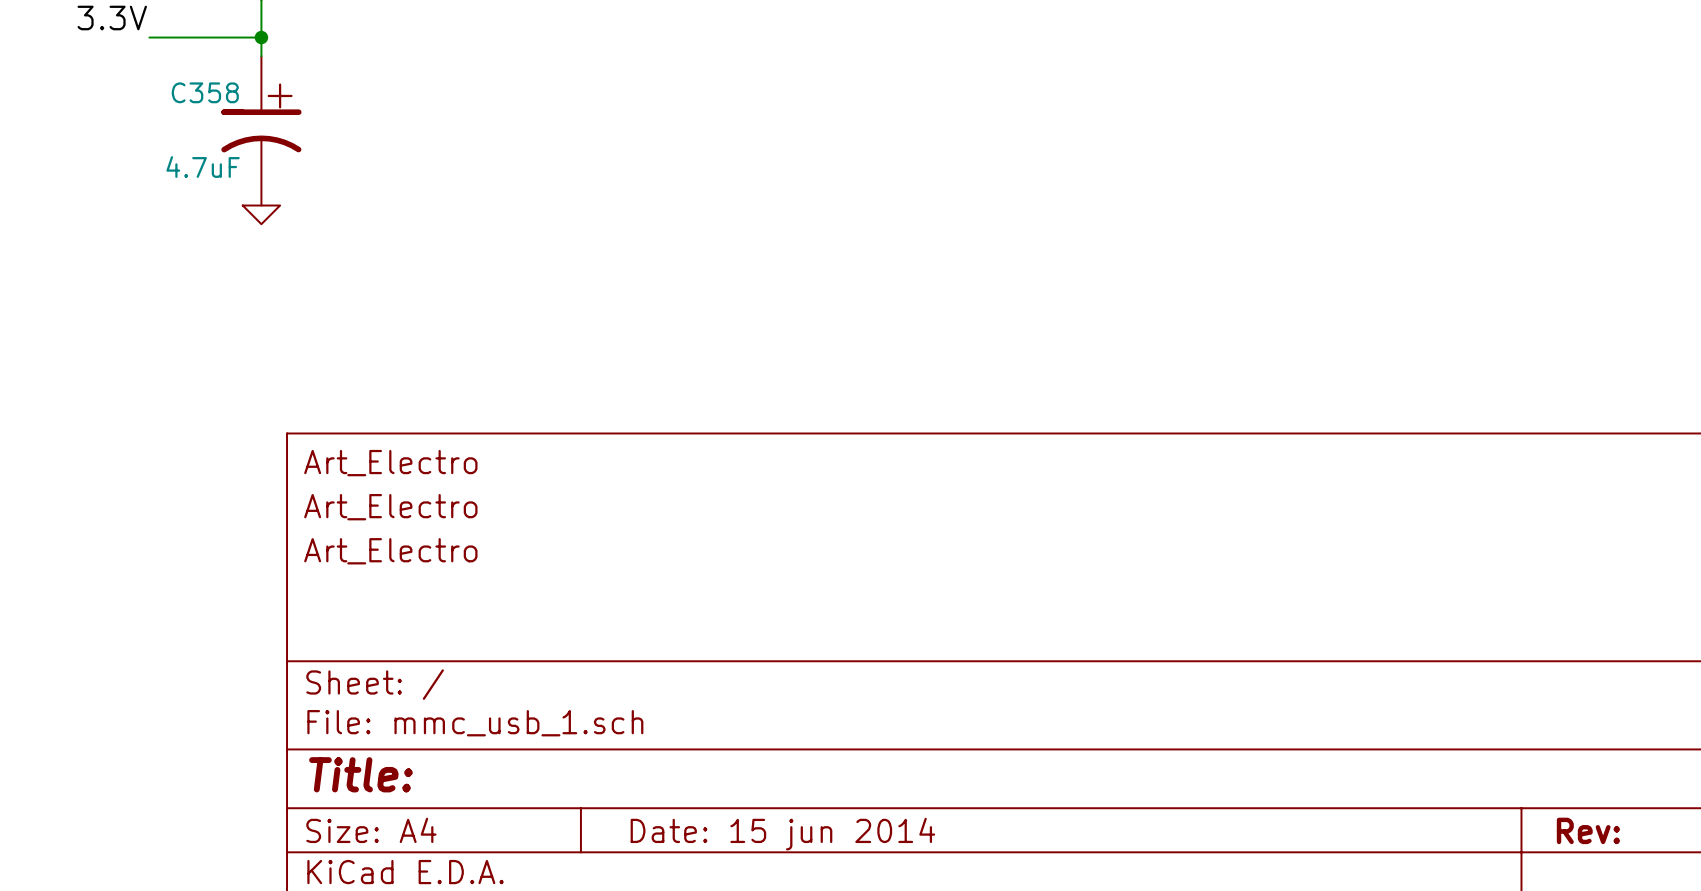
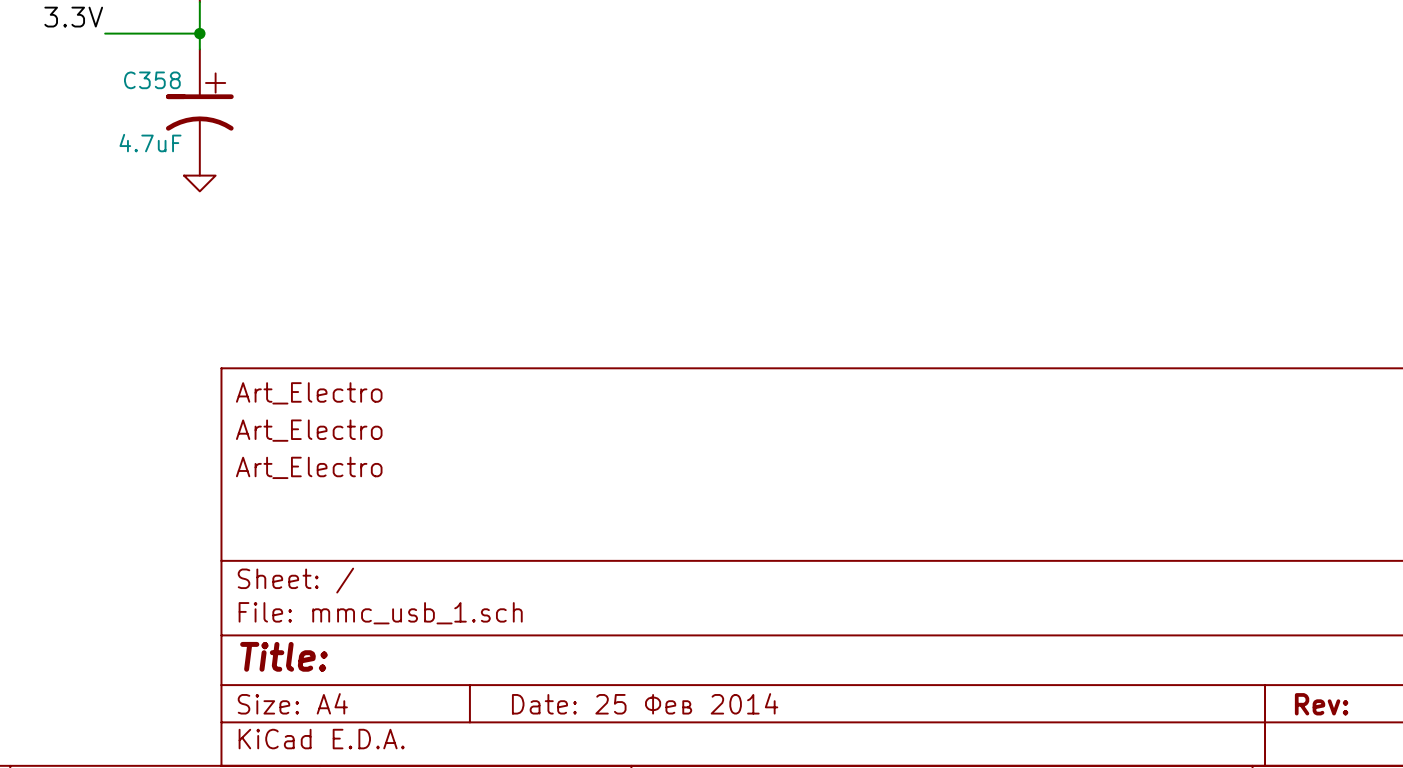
title block: Date: 15 jun 2014 (782, 834) -> Date: 25 Фев 2014 (645, 703)

